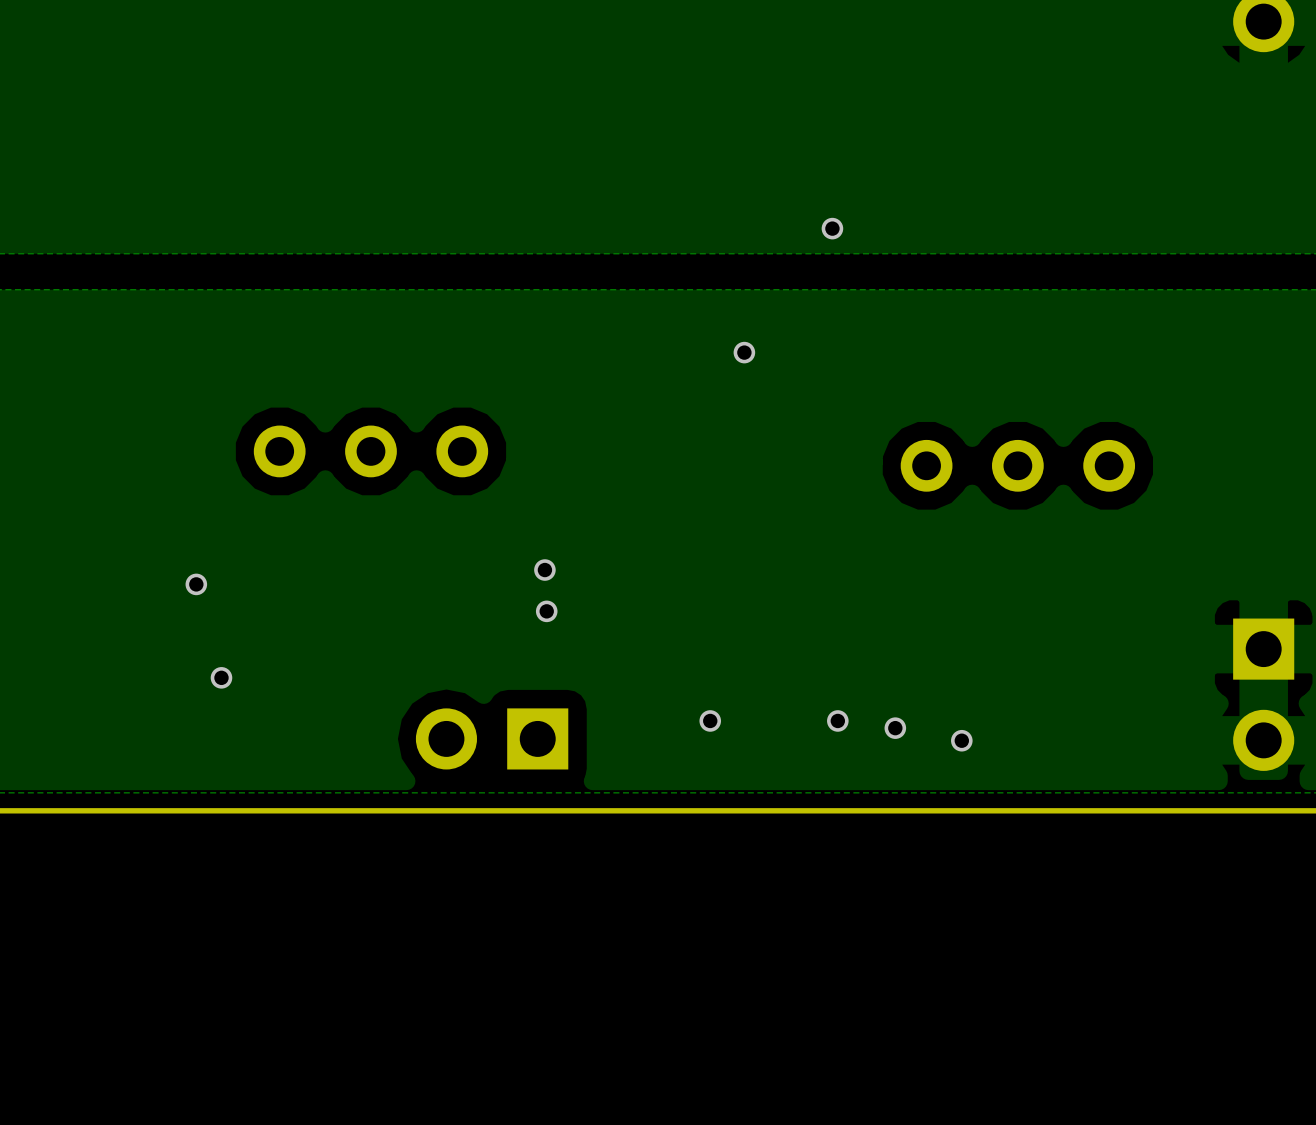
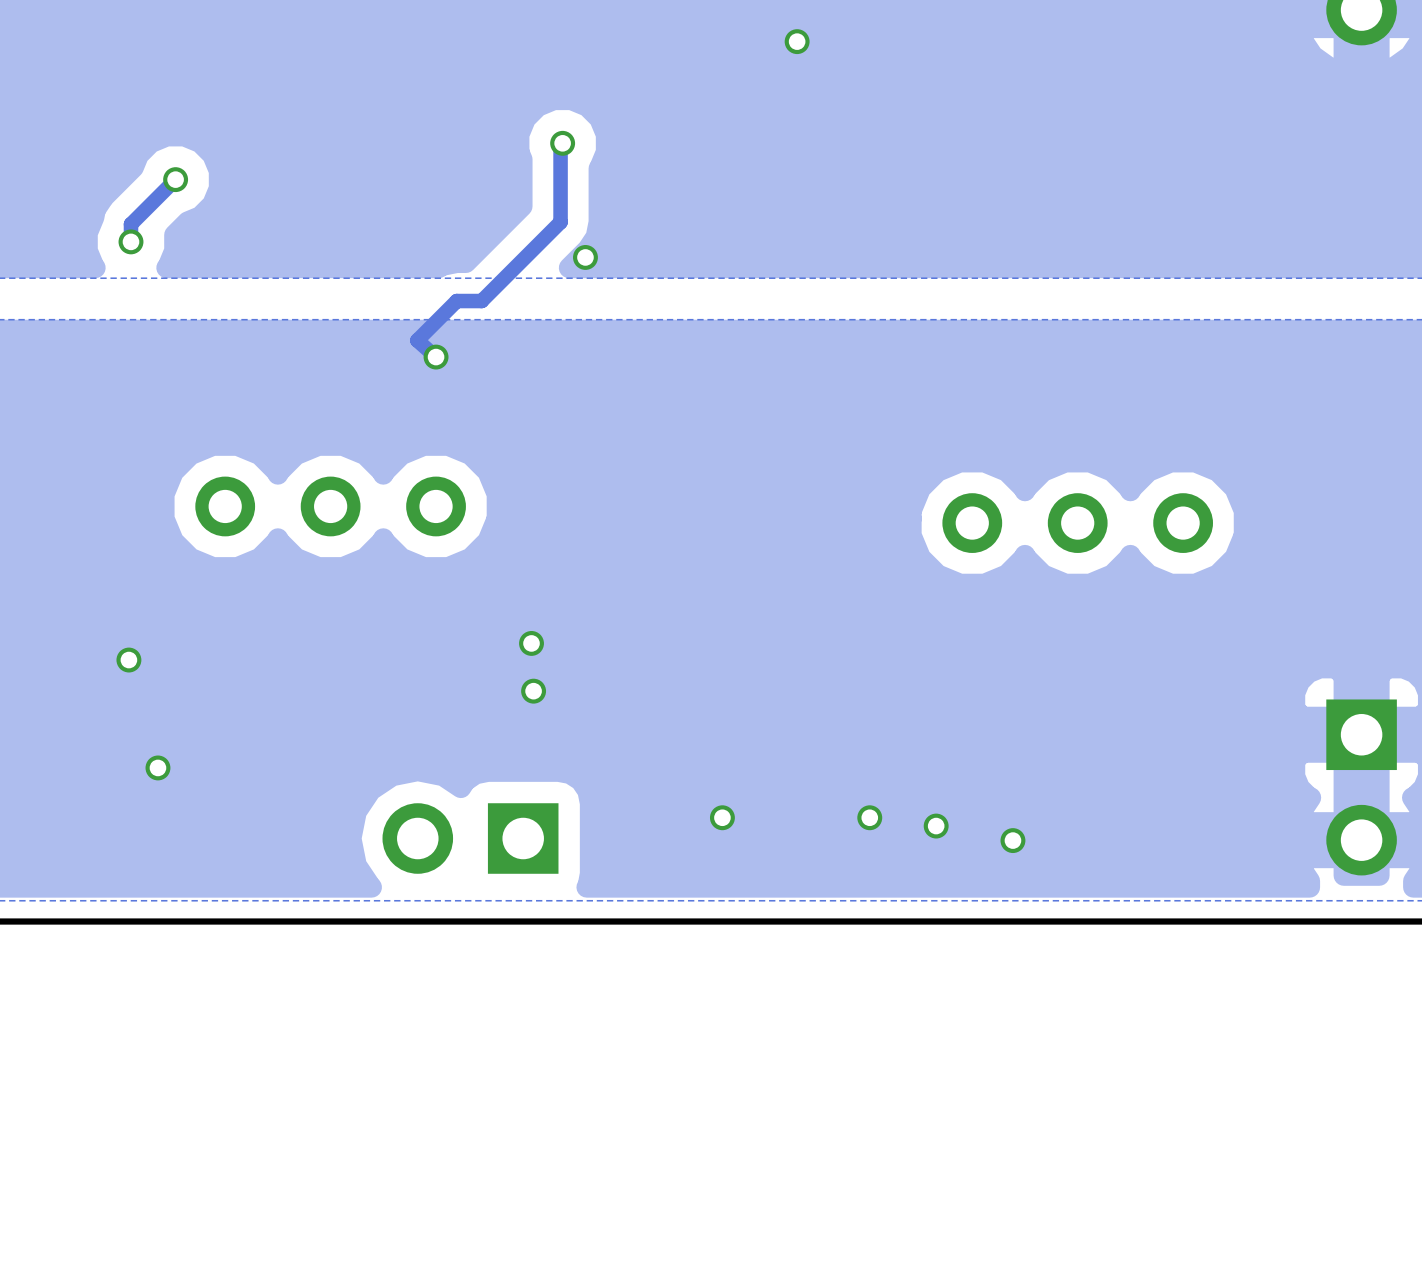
via: none -> (797, 41)
track: none -> (562, 143) (560, 145) (560, 222) (481, 301) (456, 301) (417, 340) (436, 357)
via: none -> (562, 143)
track: none -> (175, 179) (130, 224) (130, 241)
via: none -> (175, 179)
via: none -> (130, 241)
via: (832, 228) -> none
via: none -> (585, 257)
via: none -> (436, 357)
via: (744, 352) -> none

